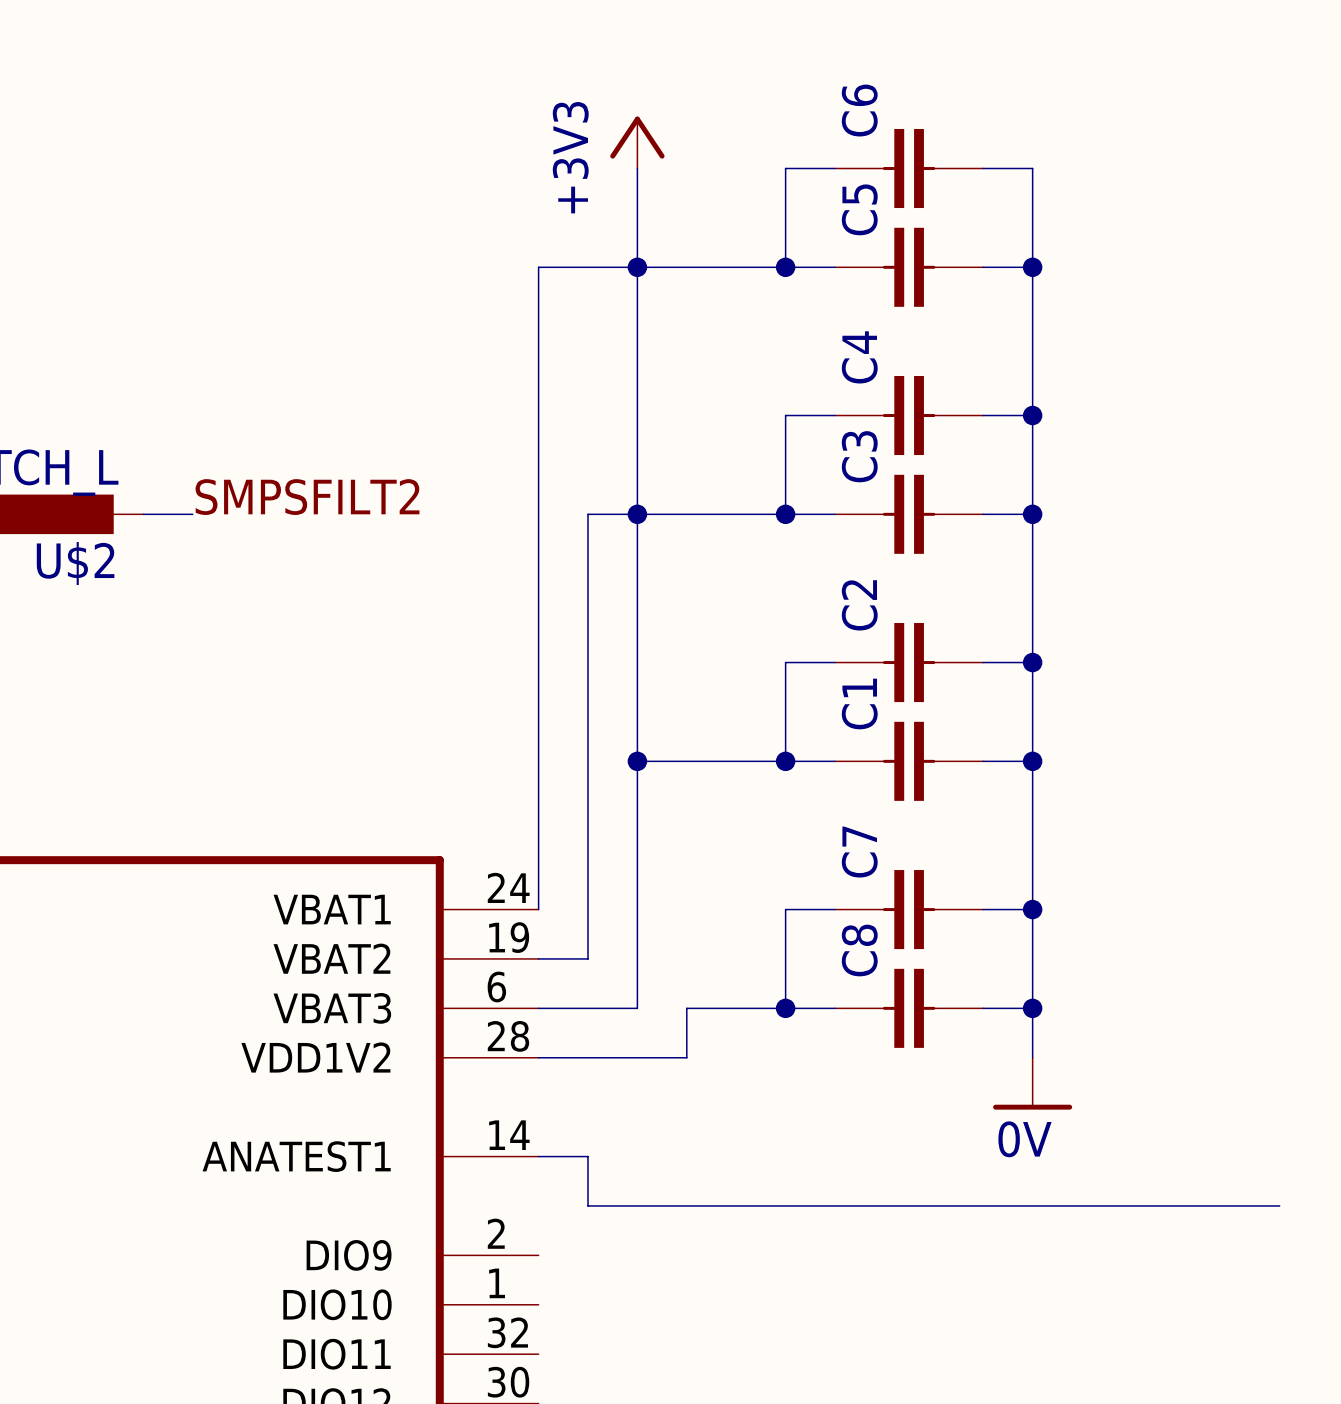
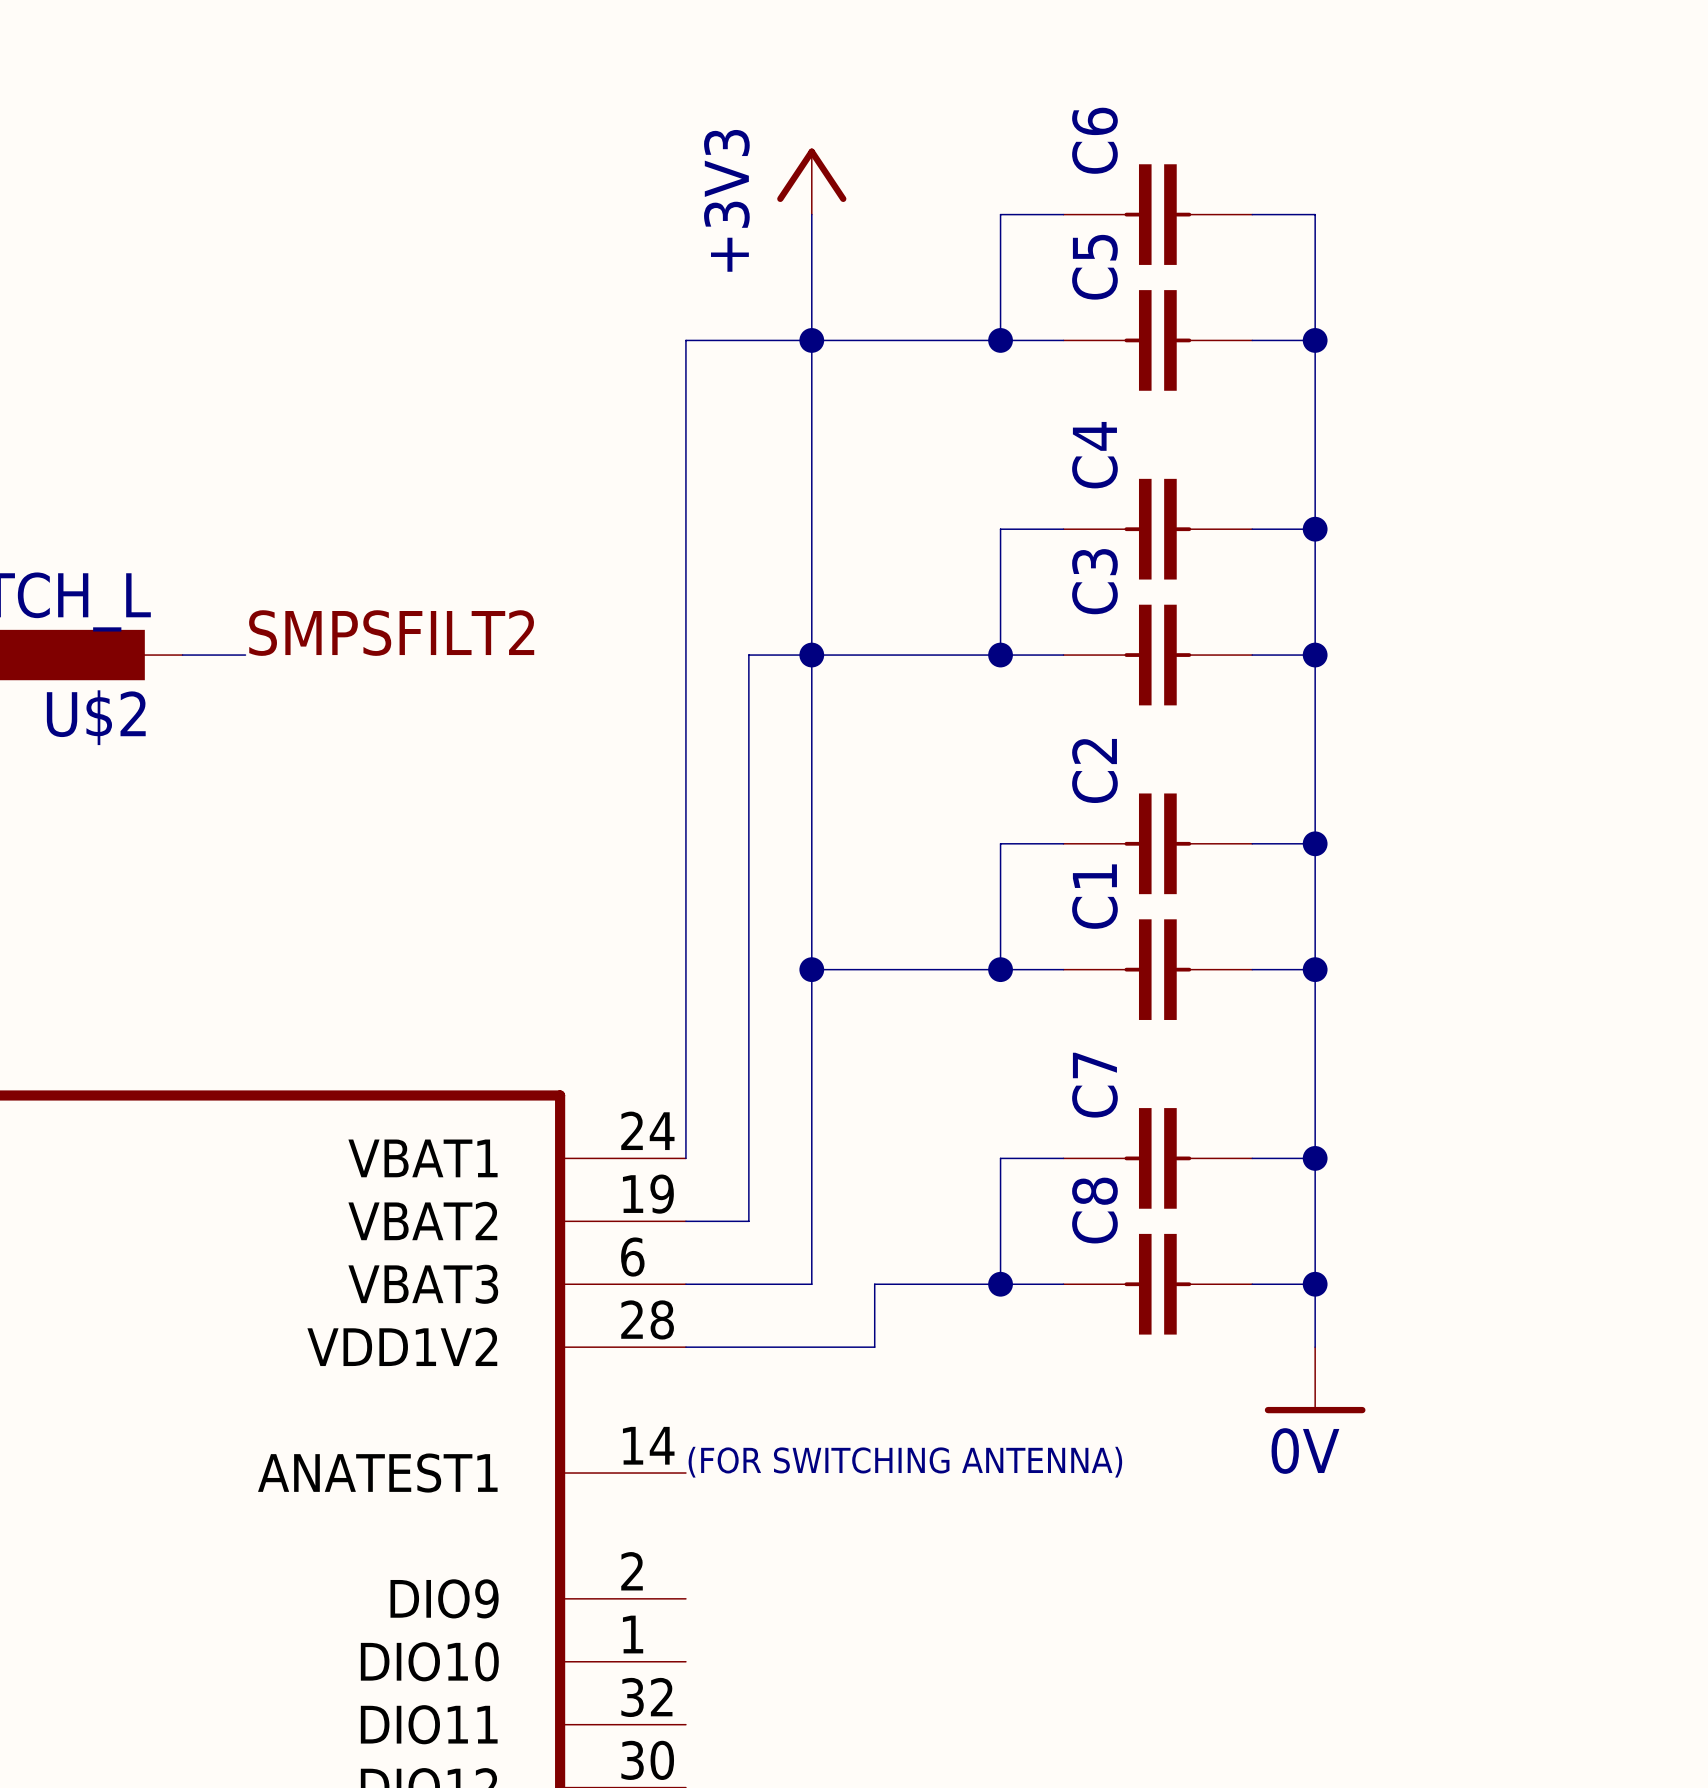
text: none -> (FOR SWITCHING ANTENNA) (905, 1462)
wire: (538, 1156) (588, 1156) (588, 1205) (1279, 1205) -> none

